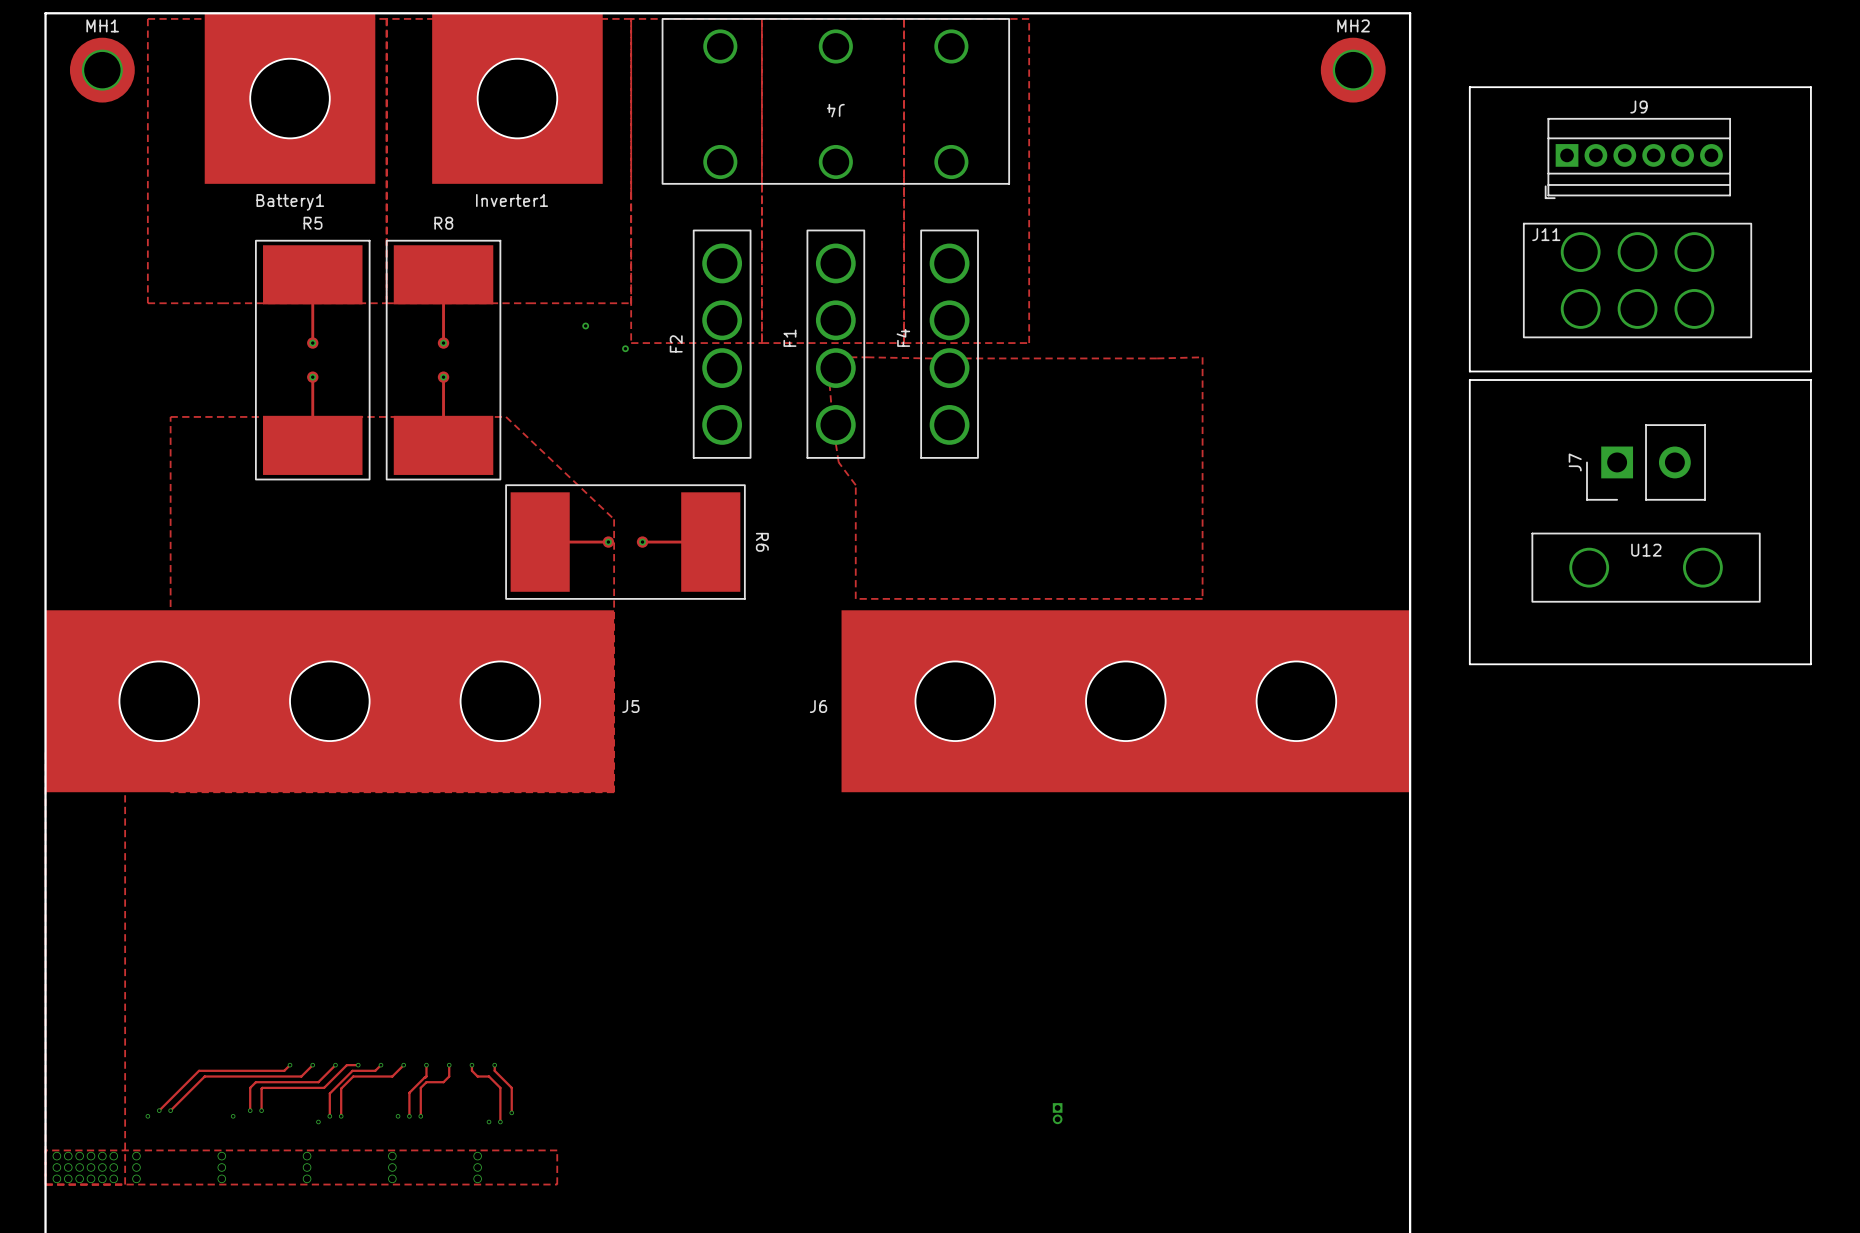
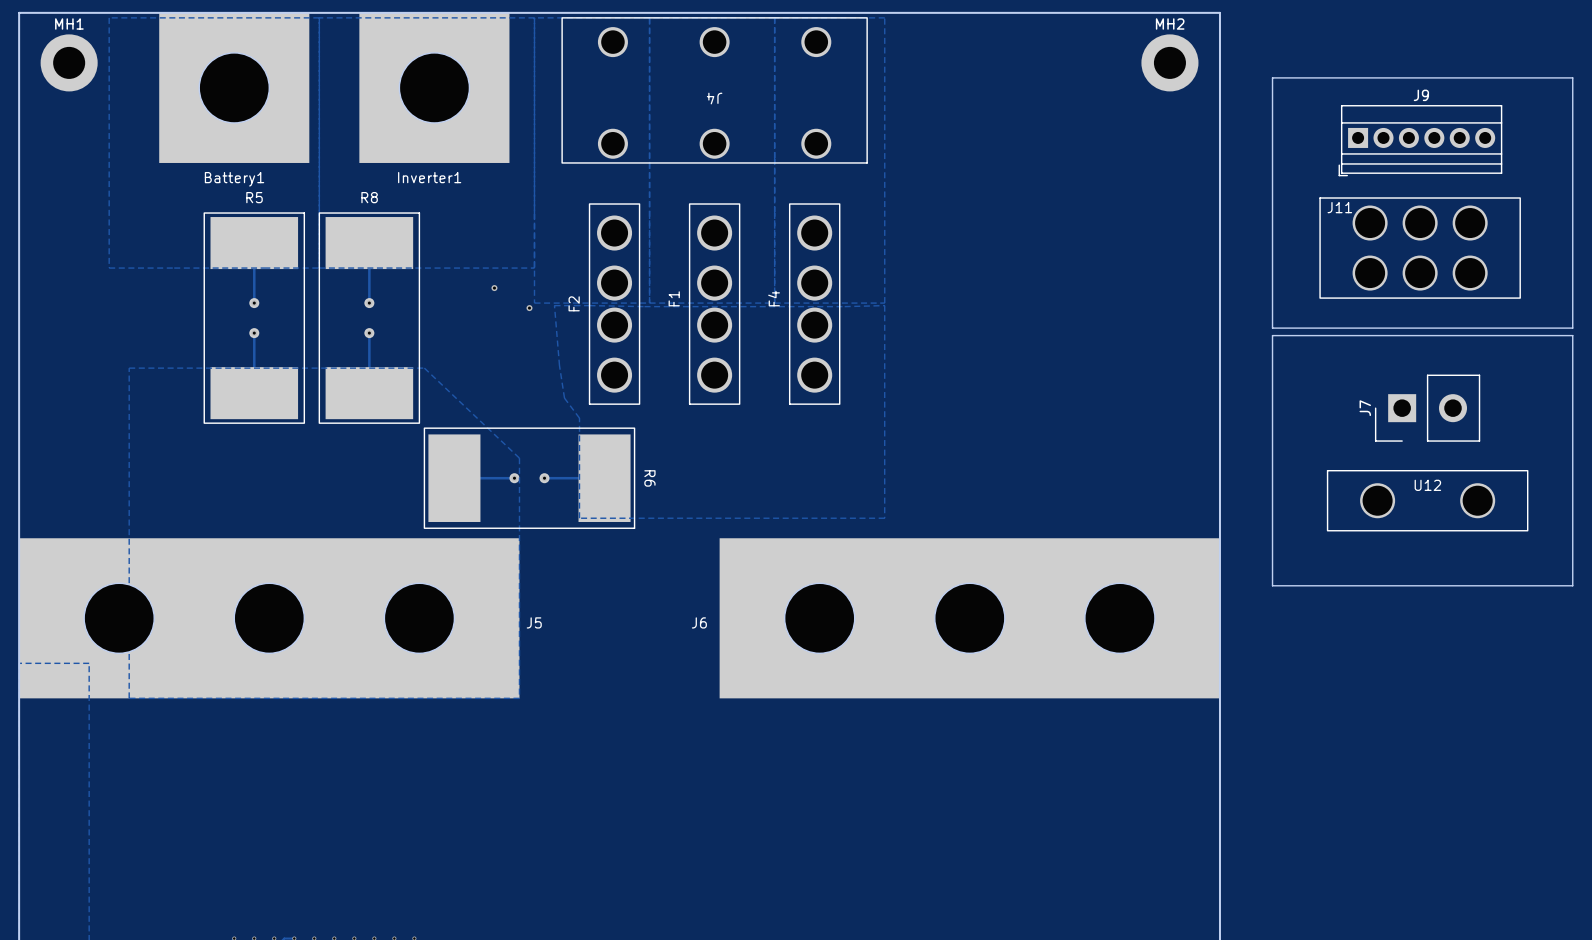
zone outline: (827, 357) (1202, 357) (1202, 598) (855, 598) (855, 485) (838, 462) (833, 425) (827, 357) -> (554, 305) (884, 305) (884, 518) (579, 518) (579, 418) (564, 398) (554, 305)

